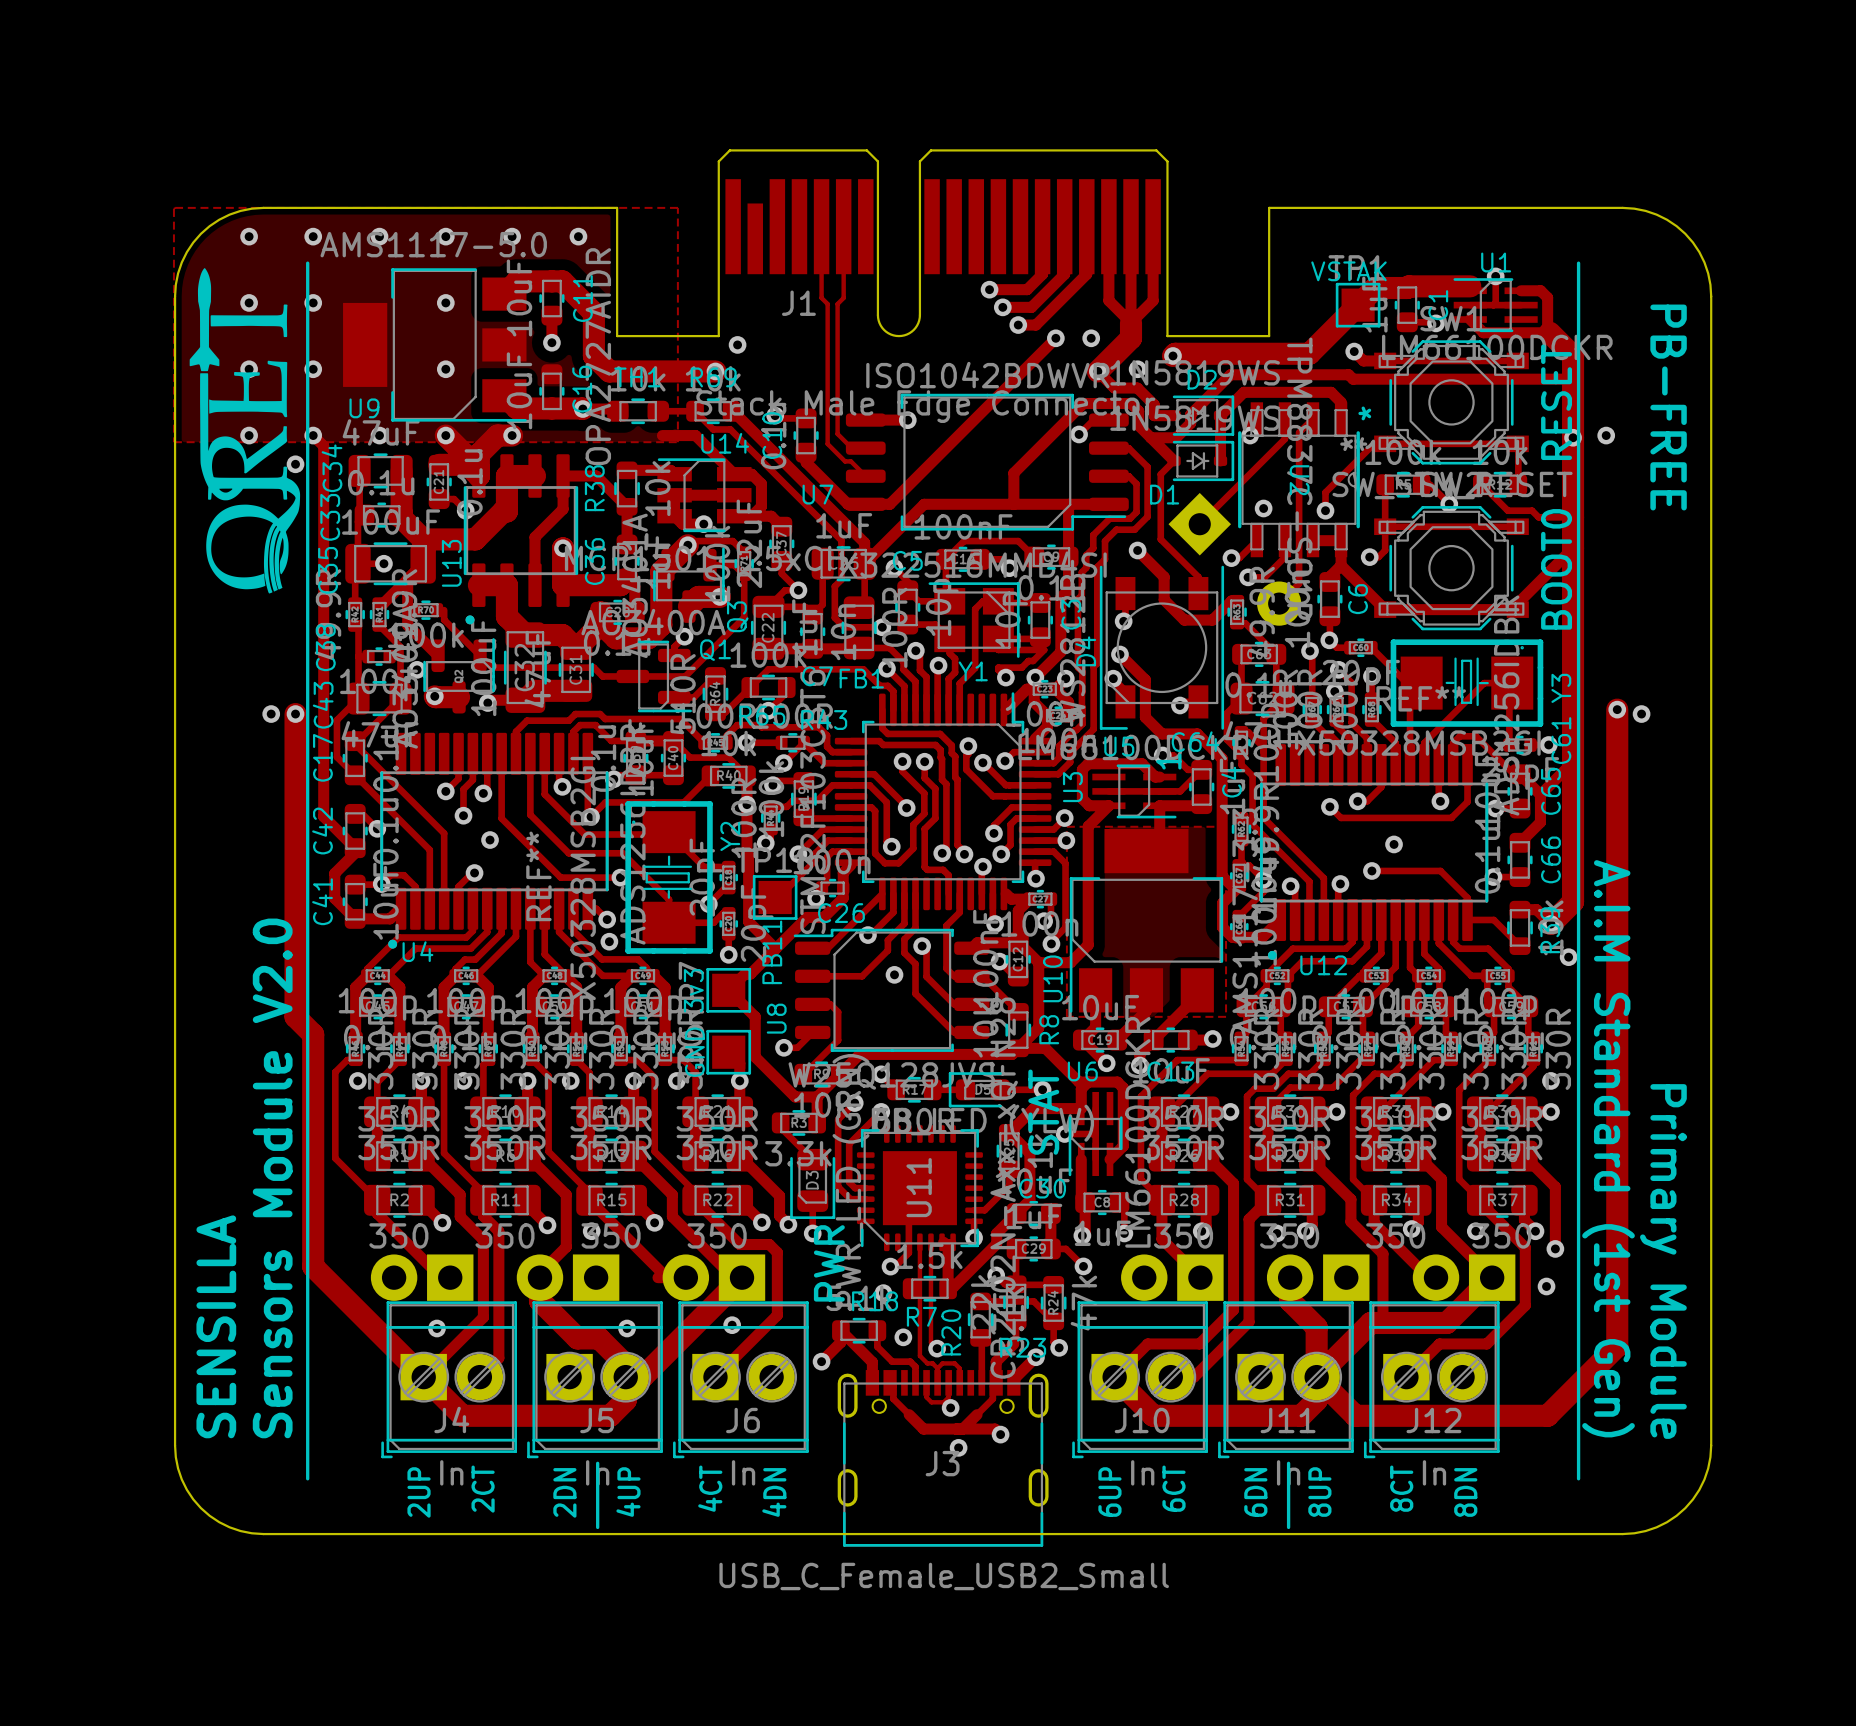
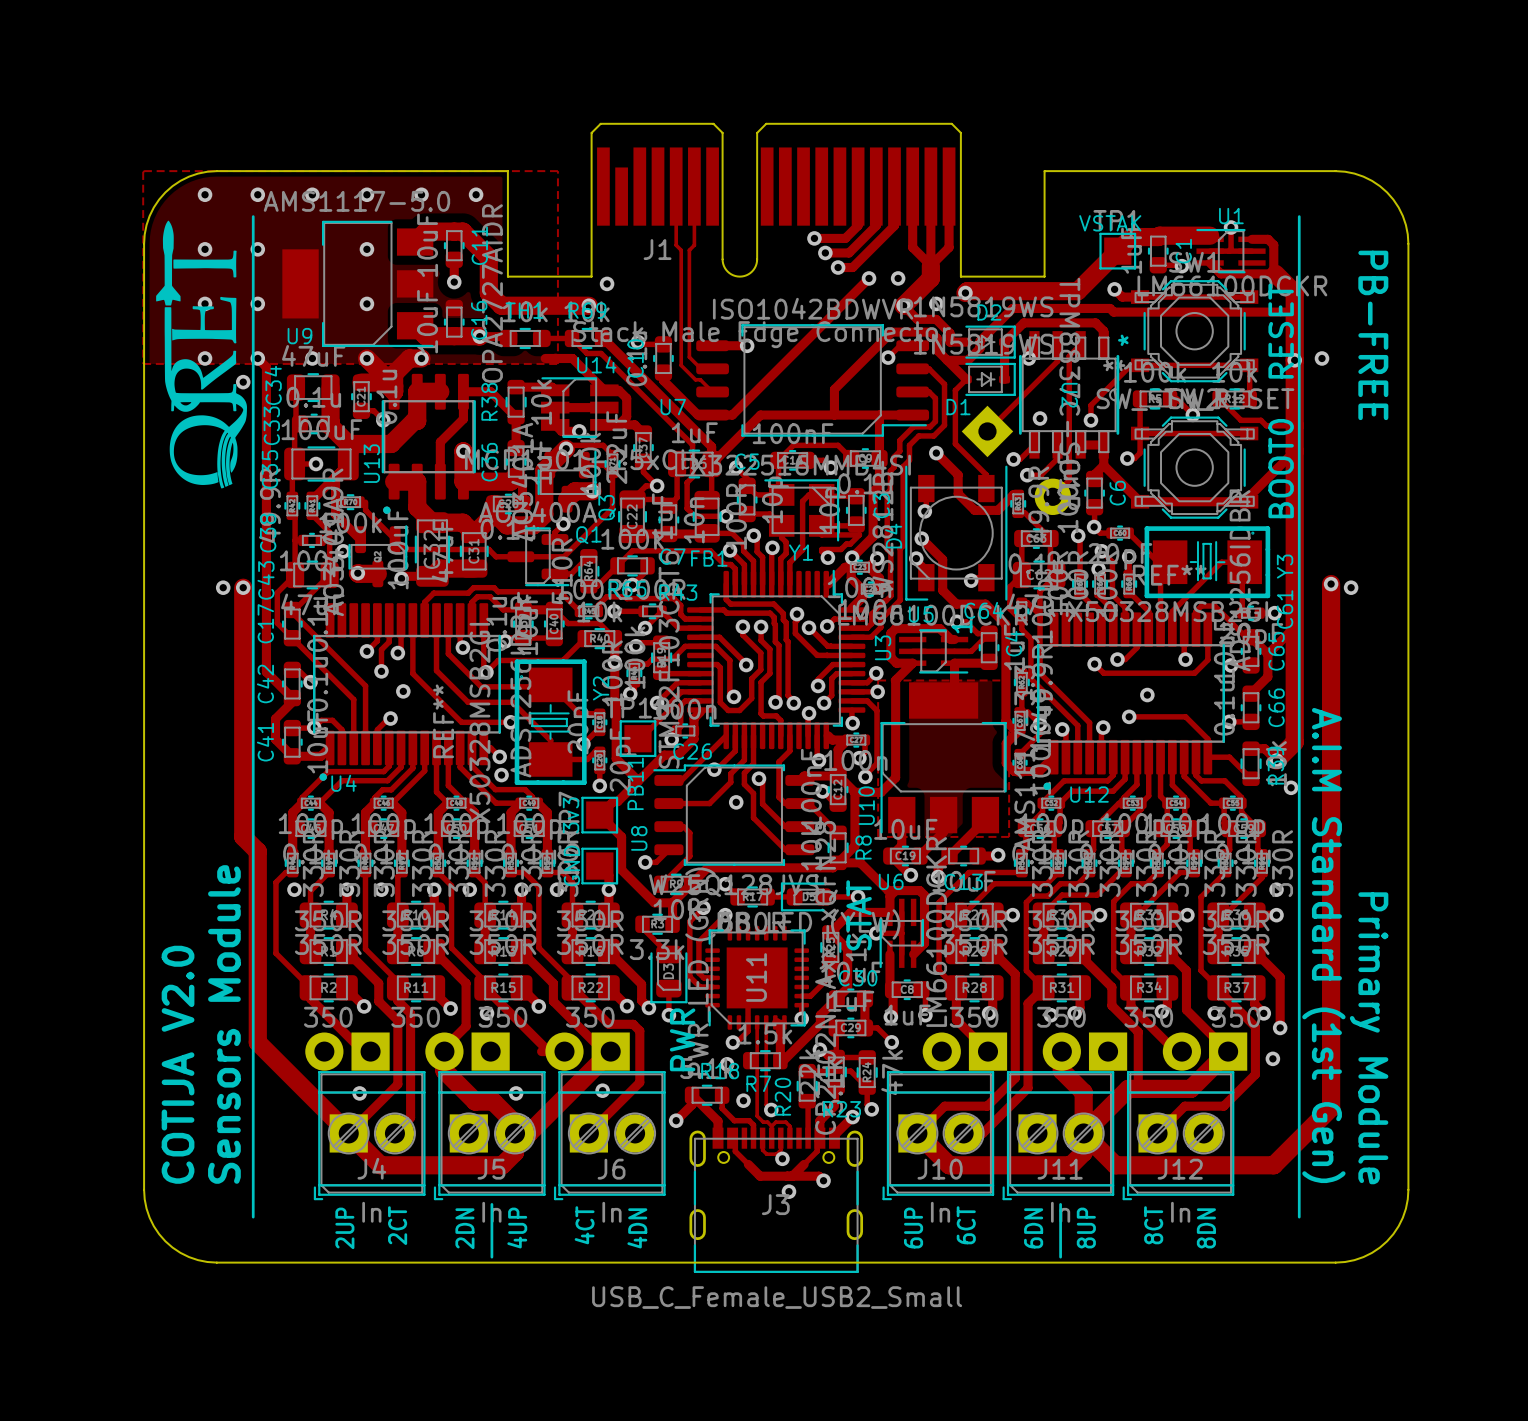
text: Sensors Module V2.0 (272, 1178) -> Sensors Module (224, 1024)
text: SENSILLA (216, 1326) -> COTIJA V2.0 (178, 1064)

